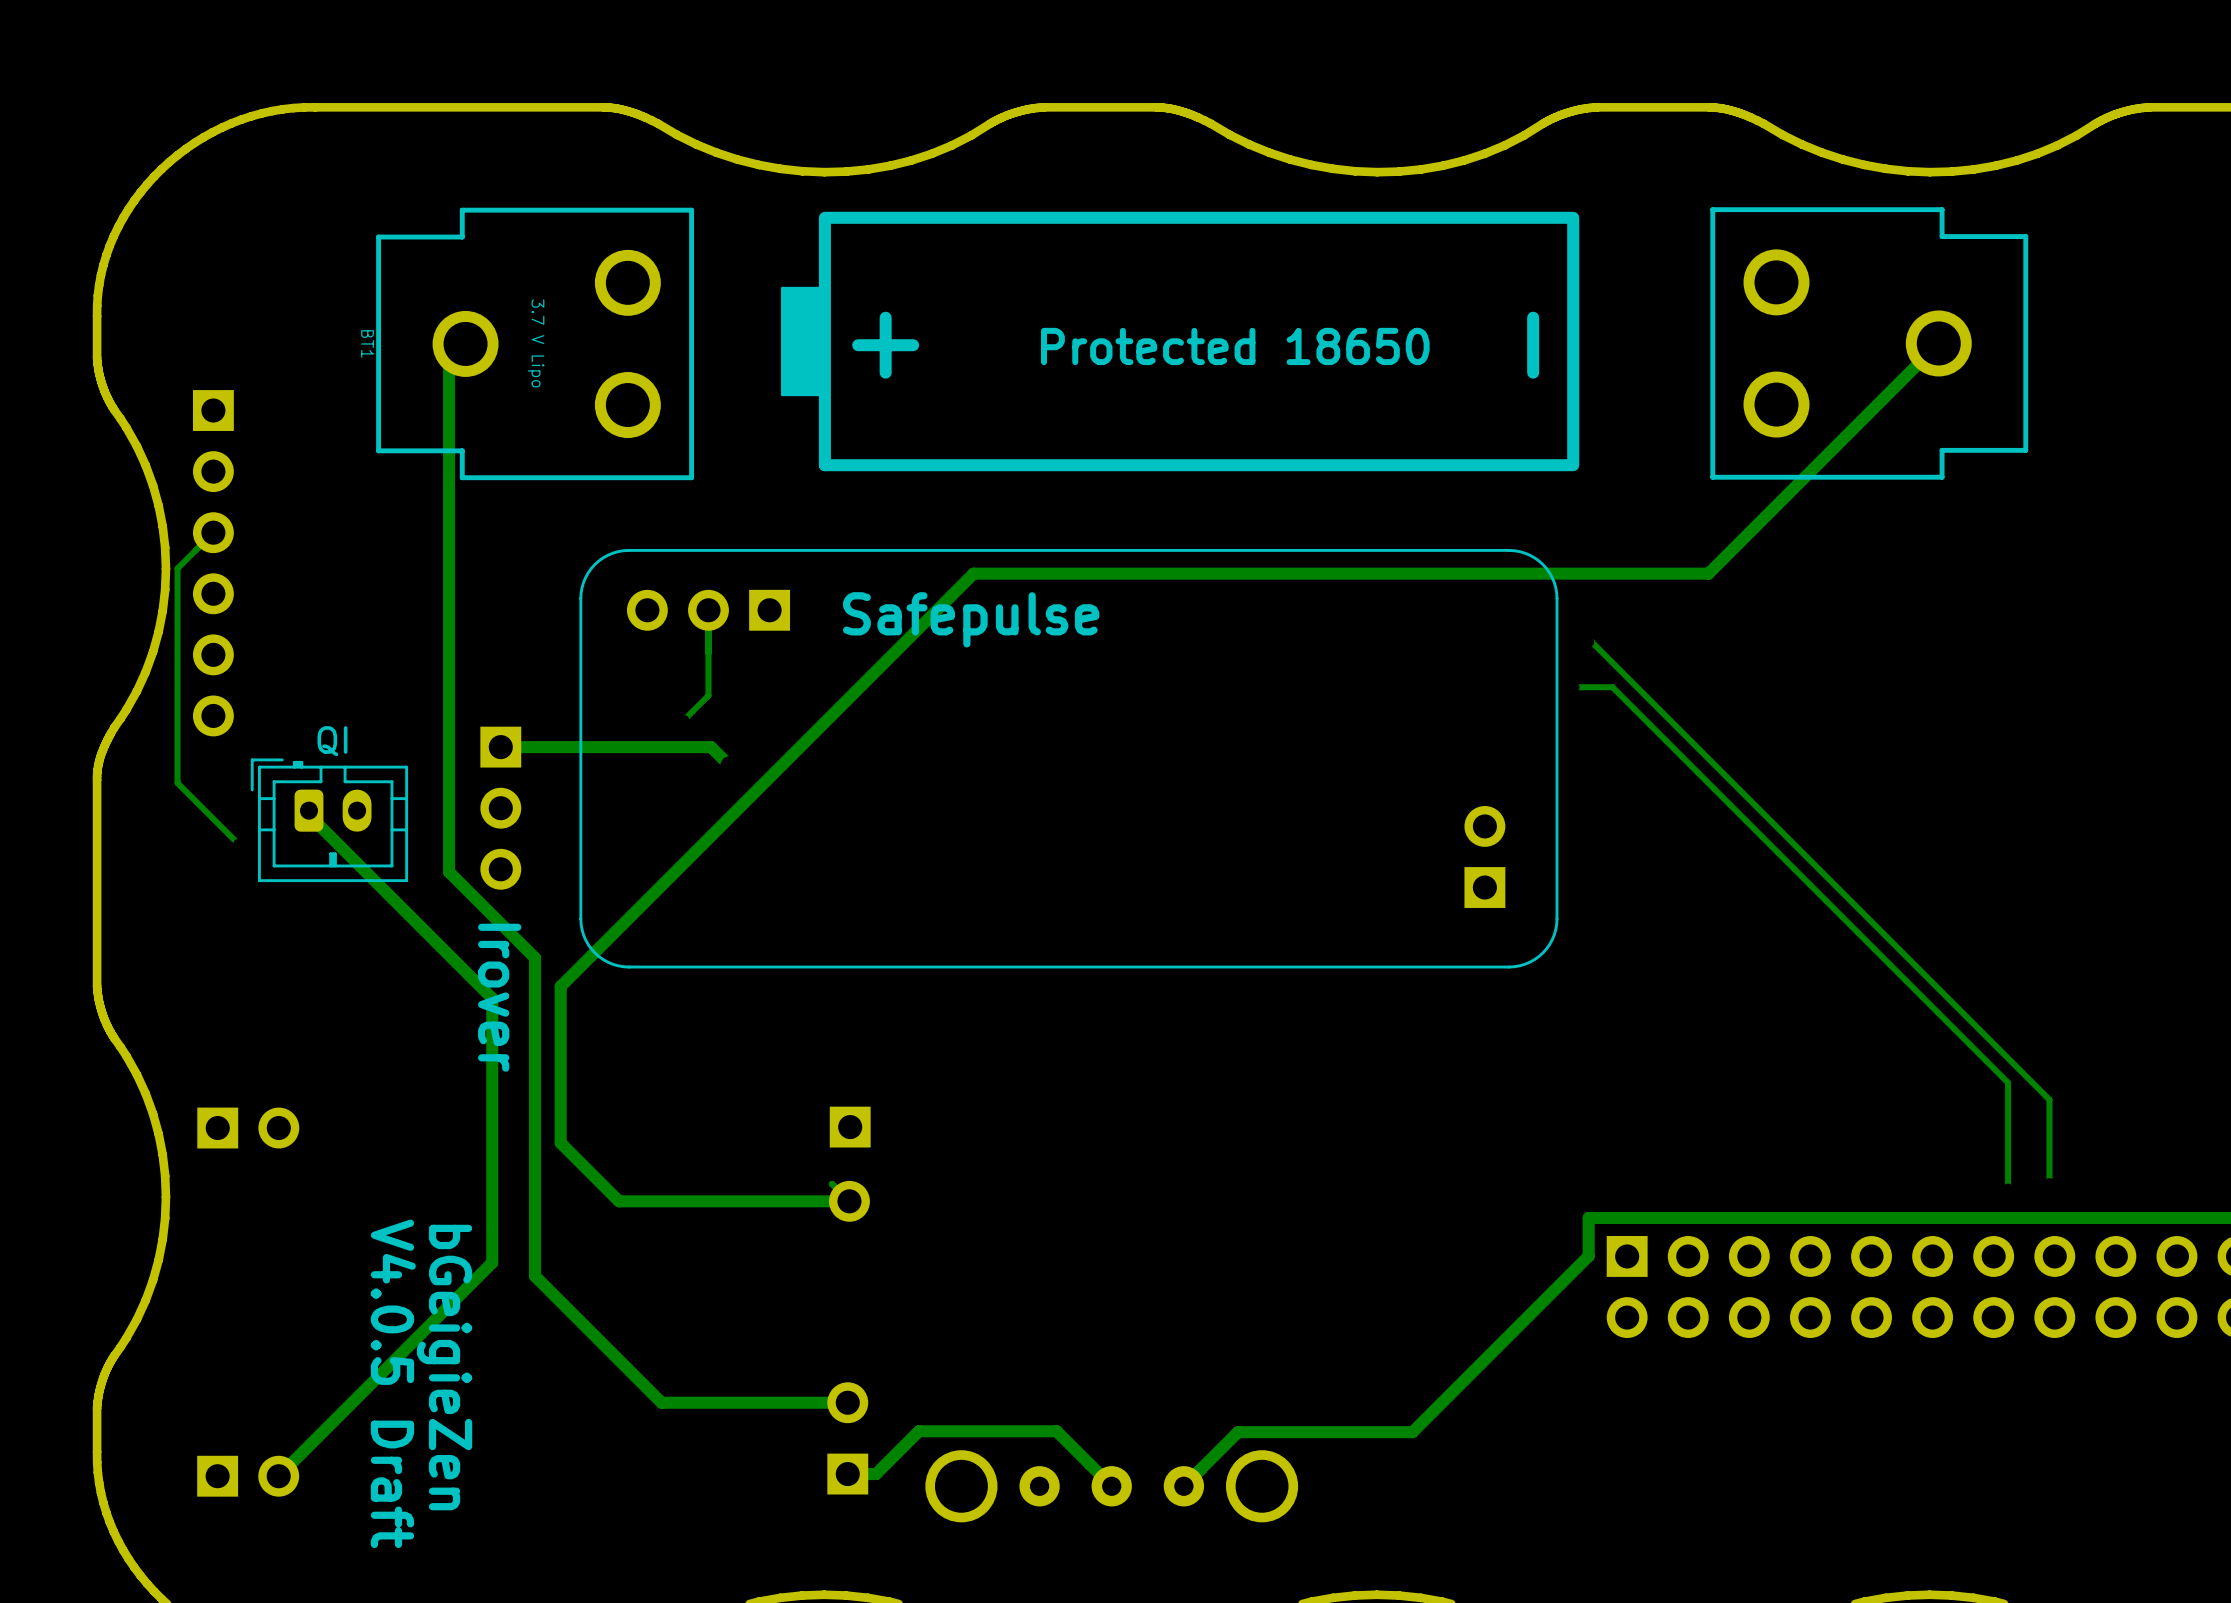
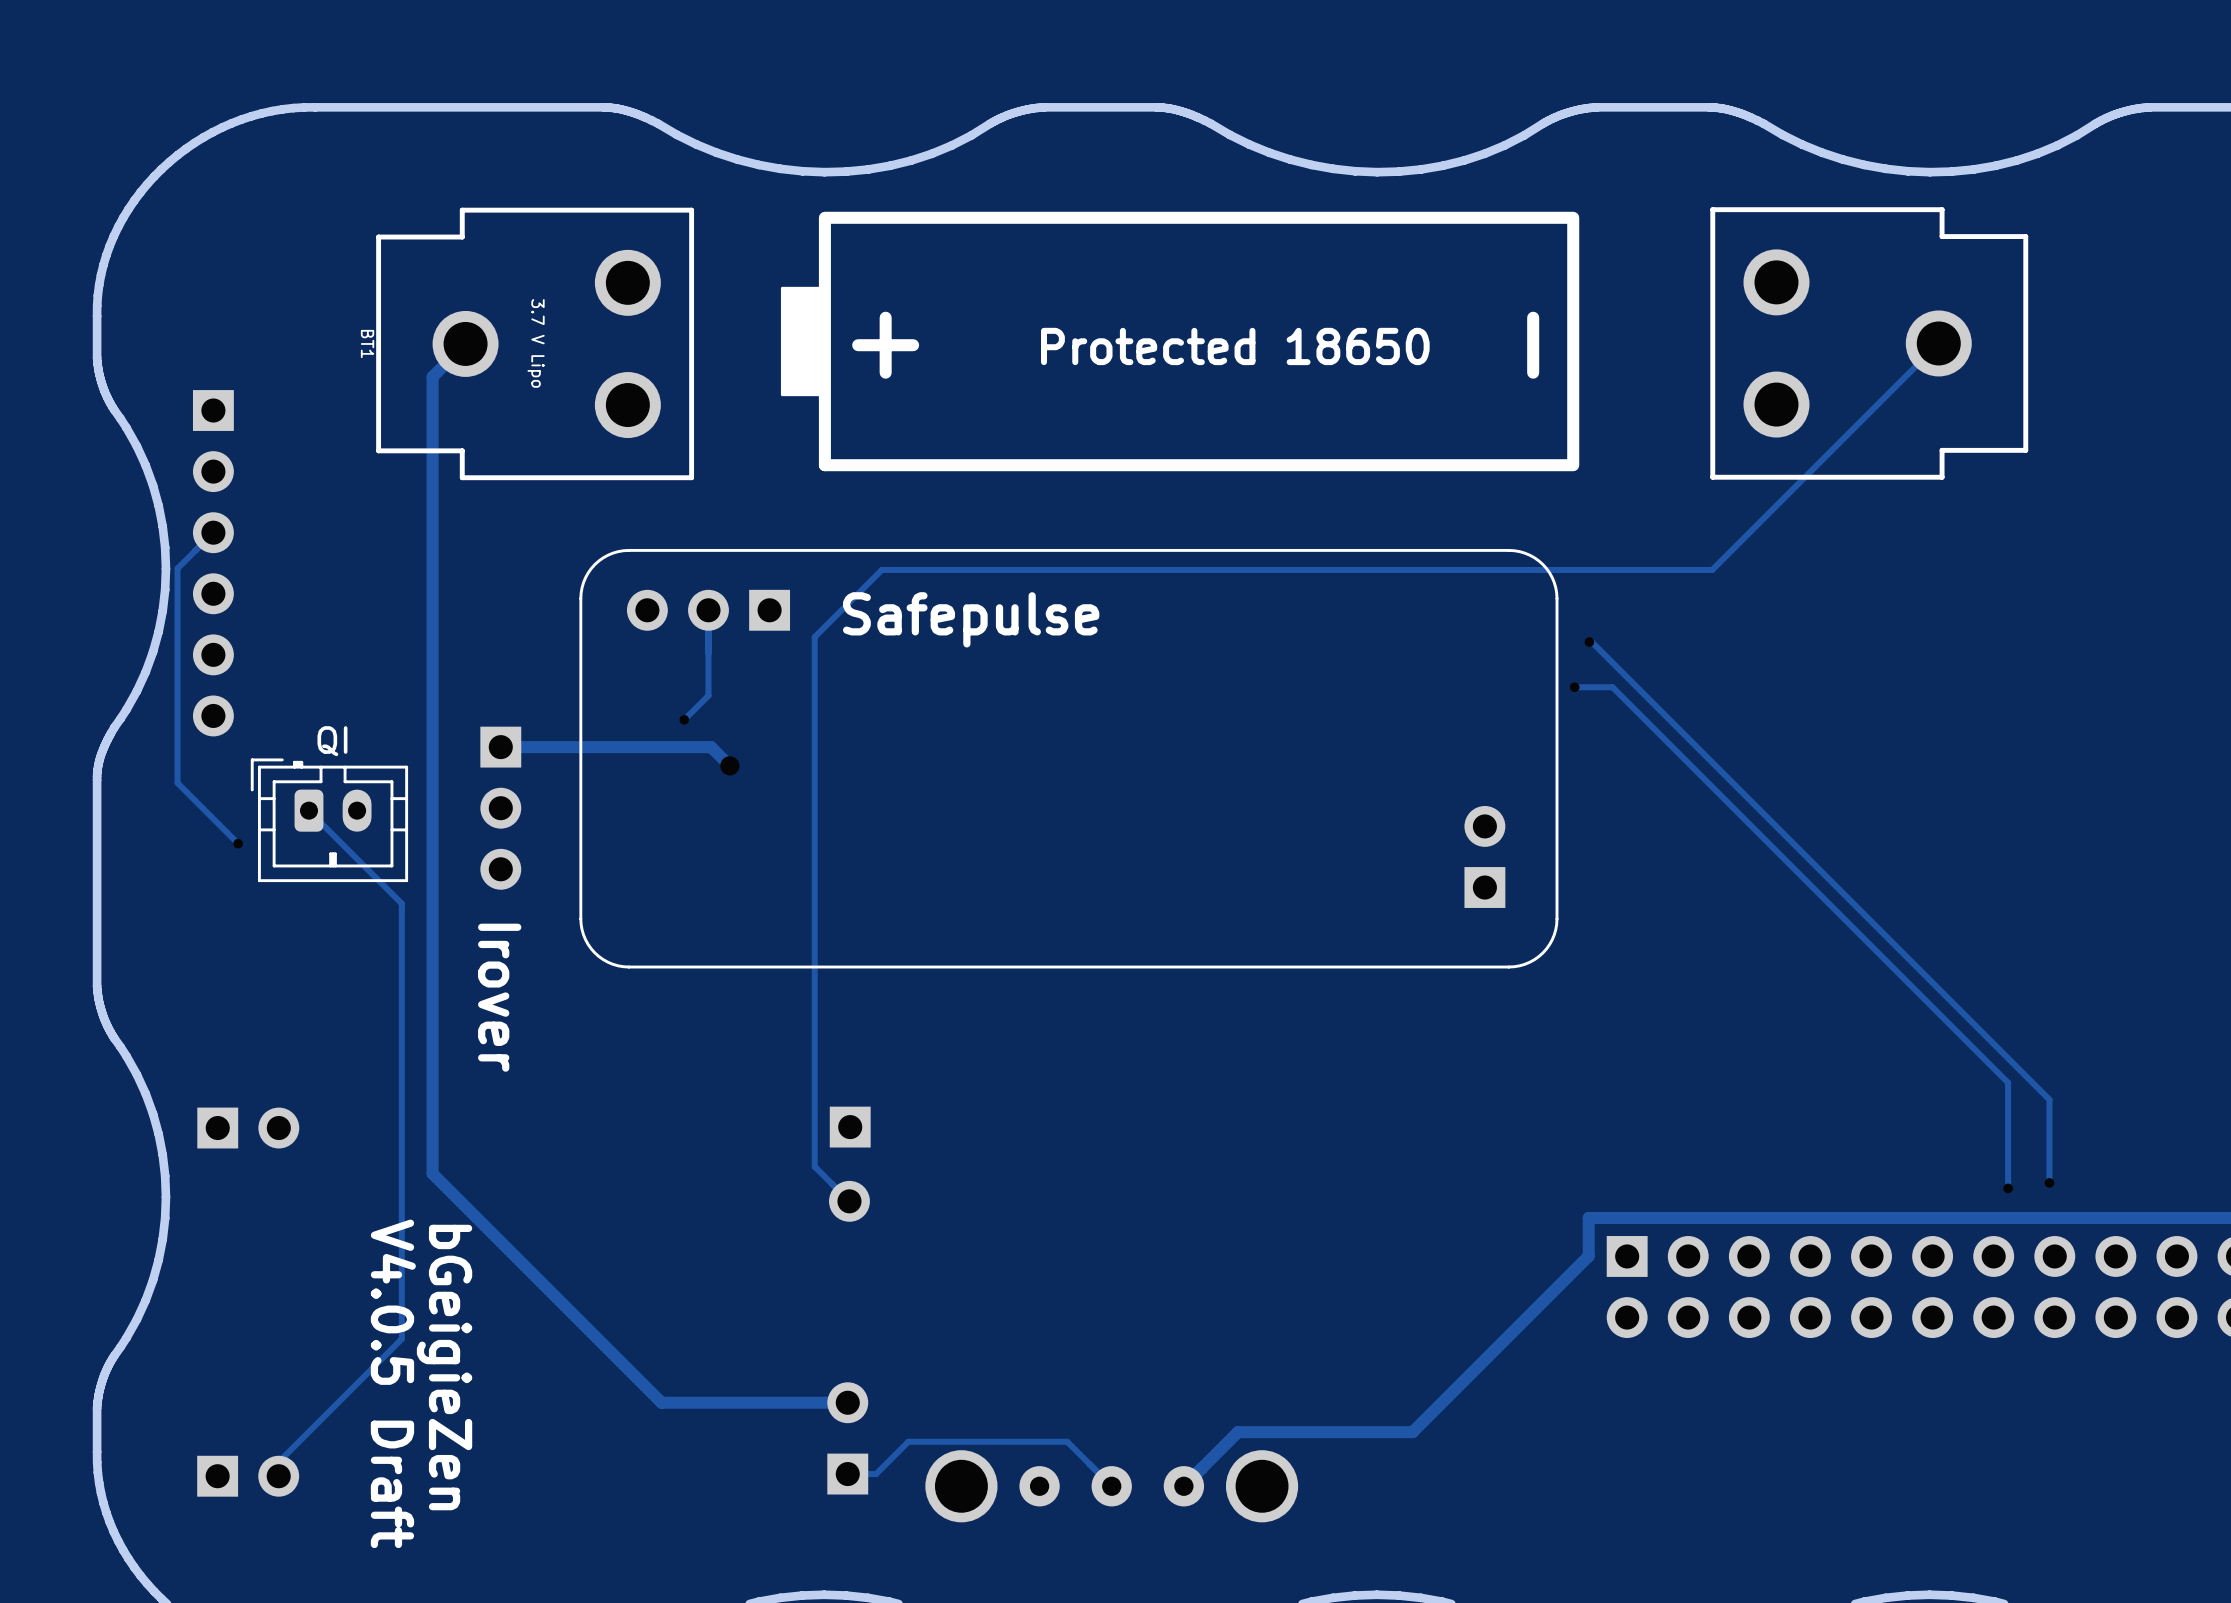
track width: thick (1938, 343) (1708, 573) -> thin (1938, 343) (1708, 573)
track: (449, 360) (449, 871) (535, 957) (535, 1276) -> (449, 360) (432, 376) (432, 1173) (535, 1276)
track: (1712, 569) (1708, 573) (973, 573) (560, 986) (560, 1142) (619, 1201) (849, 1201) -> (1712, 569) (881, 569) (814, 637) (814, 1166) (832, 1183)
track: (308, 810) (308, 815) (492, 998) (492, 1262) (278, 1476) -> (308, 810) (401, 903) (401, 1338) (278, 1462)
track: (908, 1441) (918, 1431) (1056, 1431) (1111, 1486) -> (908, 1441) (1067, 1441) (1089, 1464)
track width: thick (908, 1441) (876, 1474) (847, 1474) -> thin (908, 1441) (876, 1474) (847, 1474)

